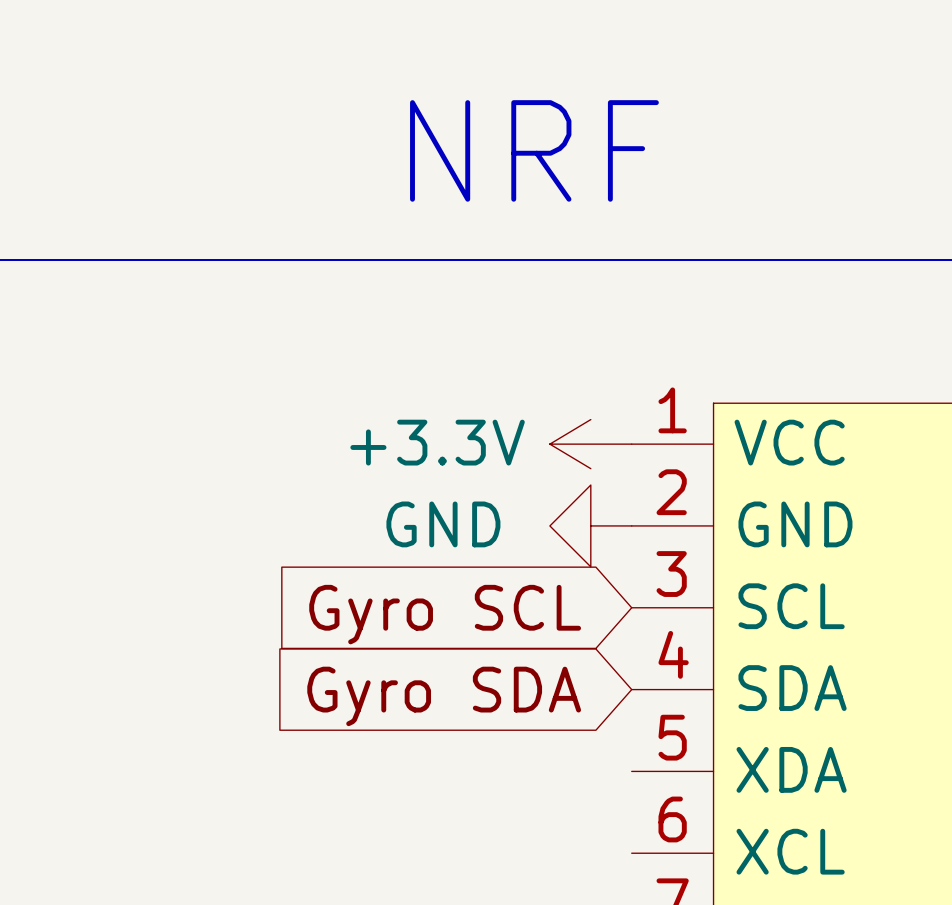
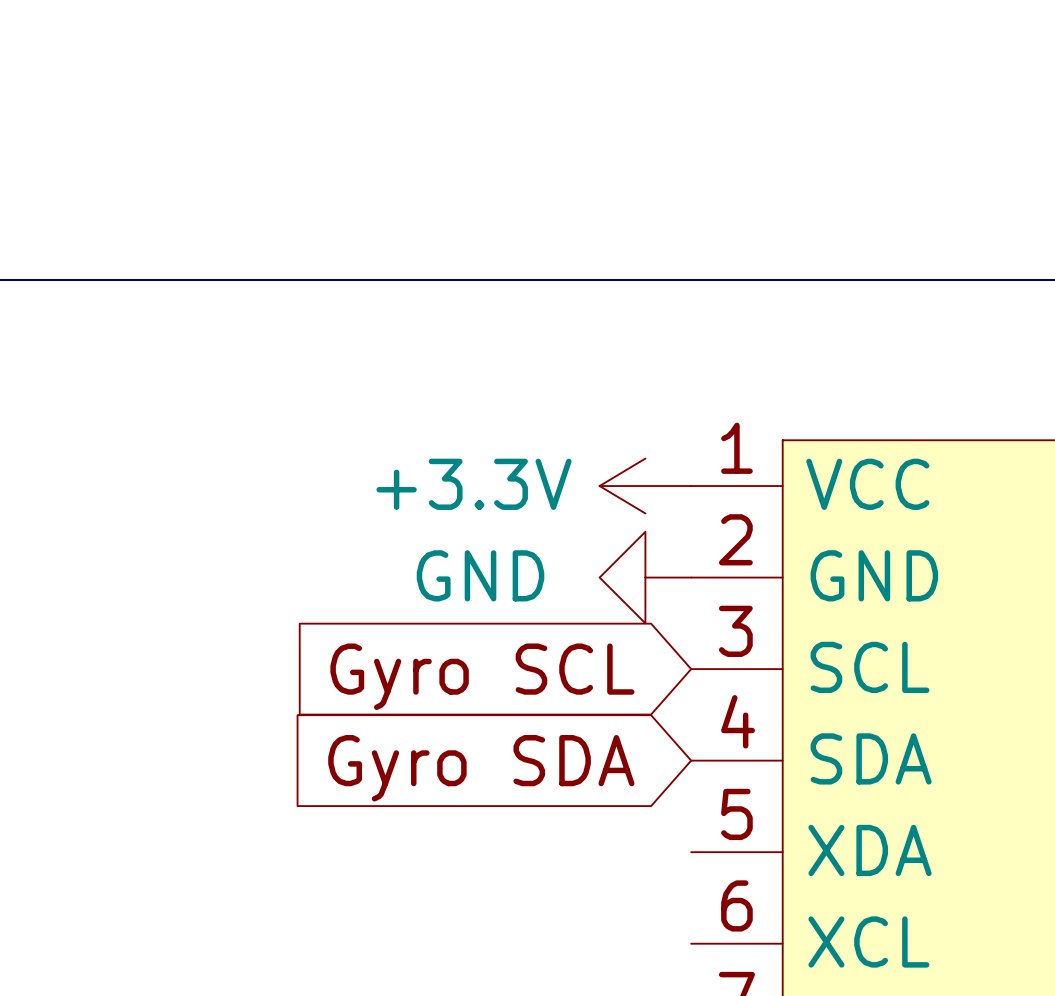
text: NRF (534, 150) -> none

